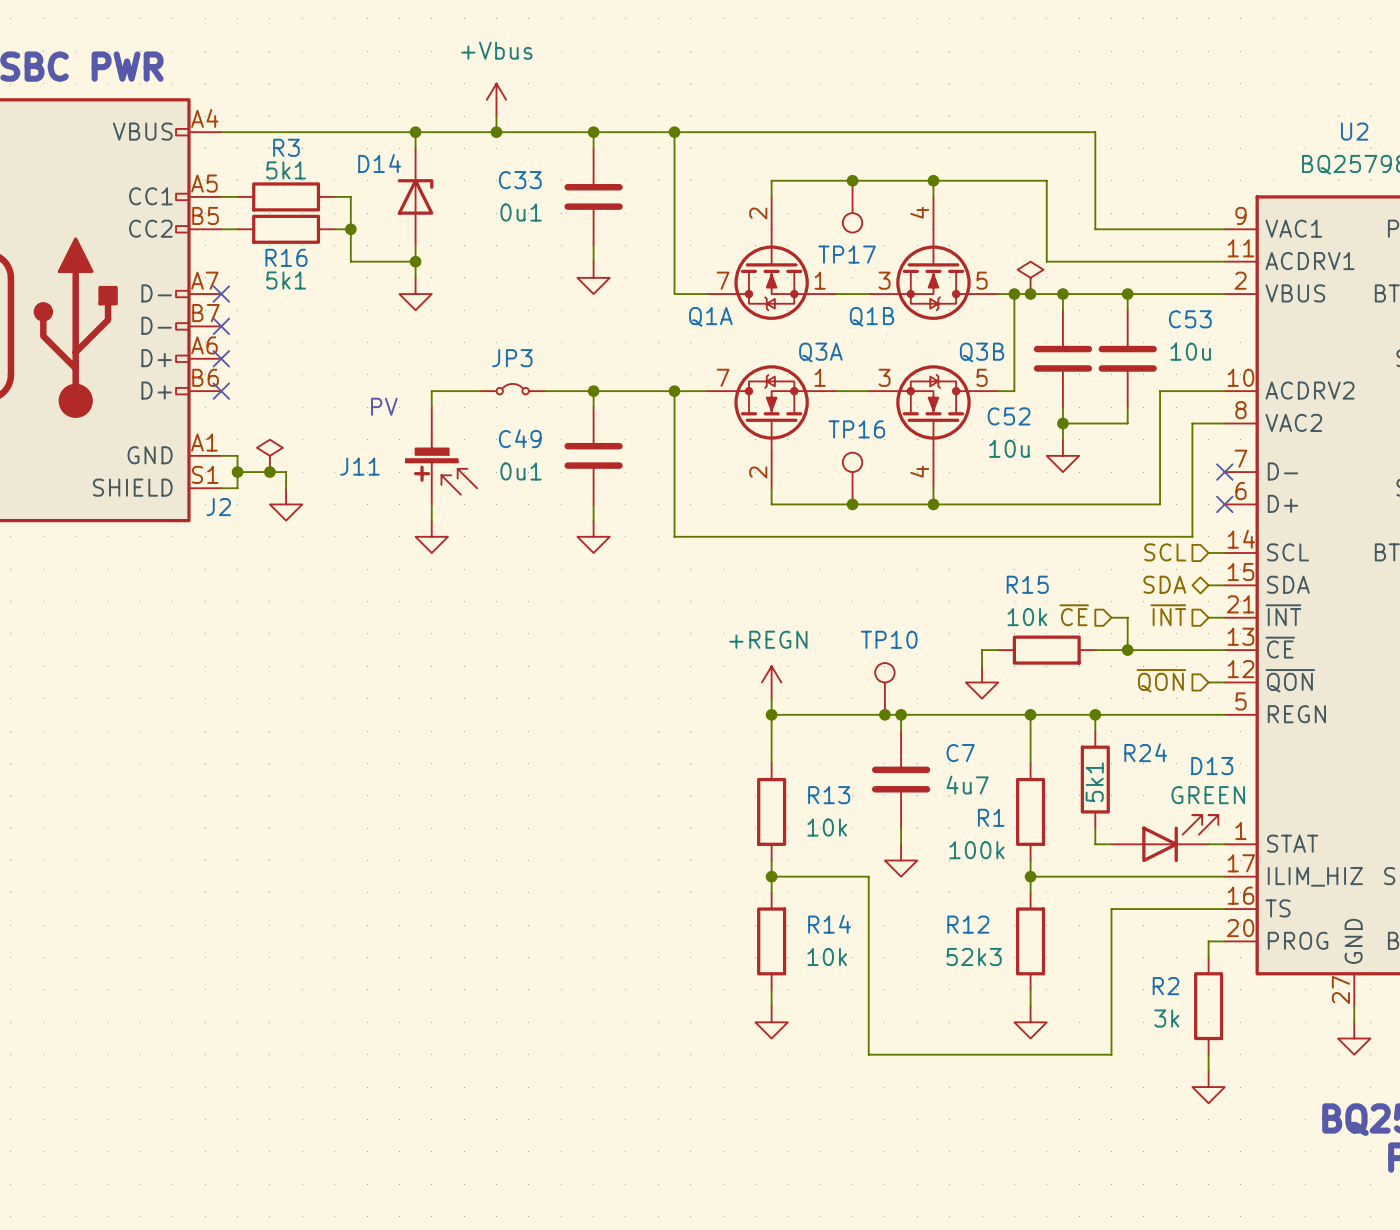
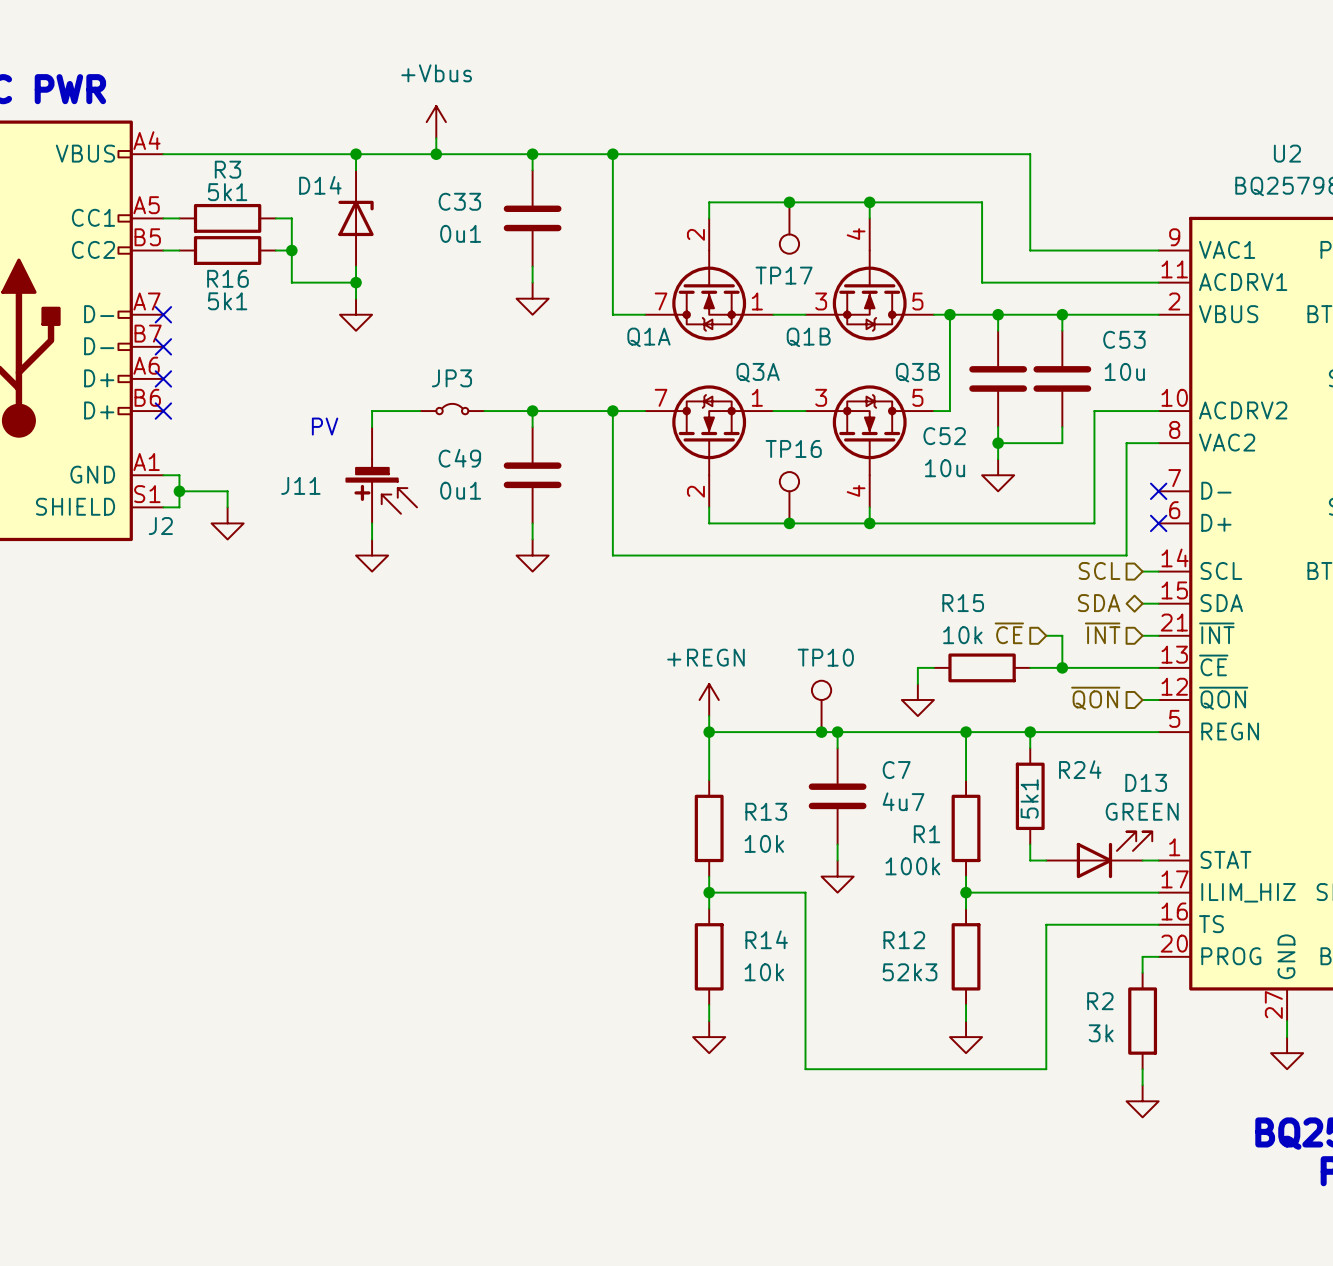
power symbol: (1030, 277) -> none
junction: (1030, 294) -> none
power symbol: (269, 455) -> none
junction: (269, 472) -> none

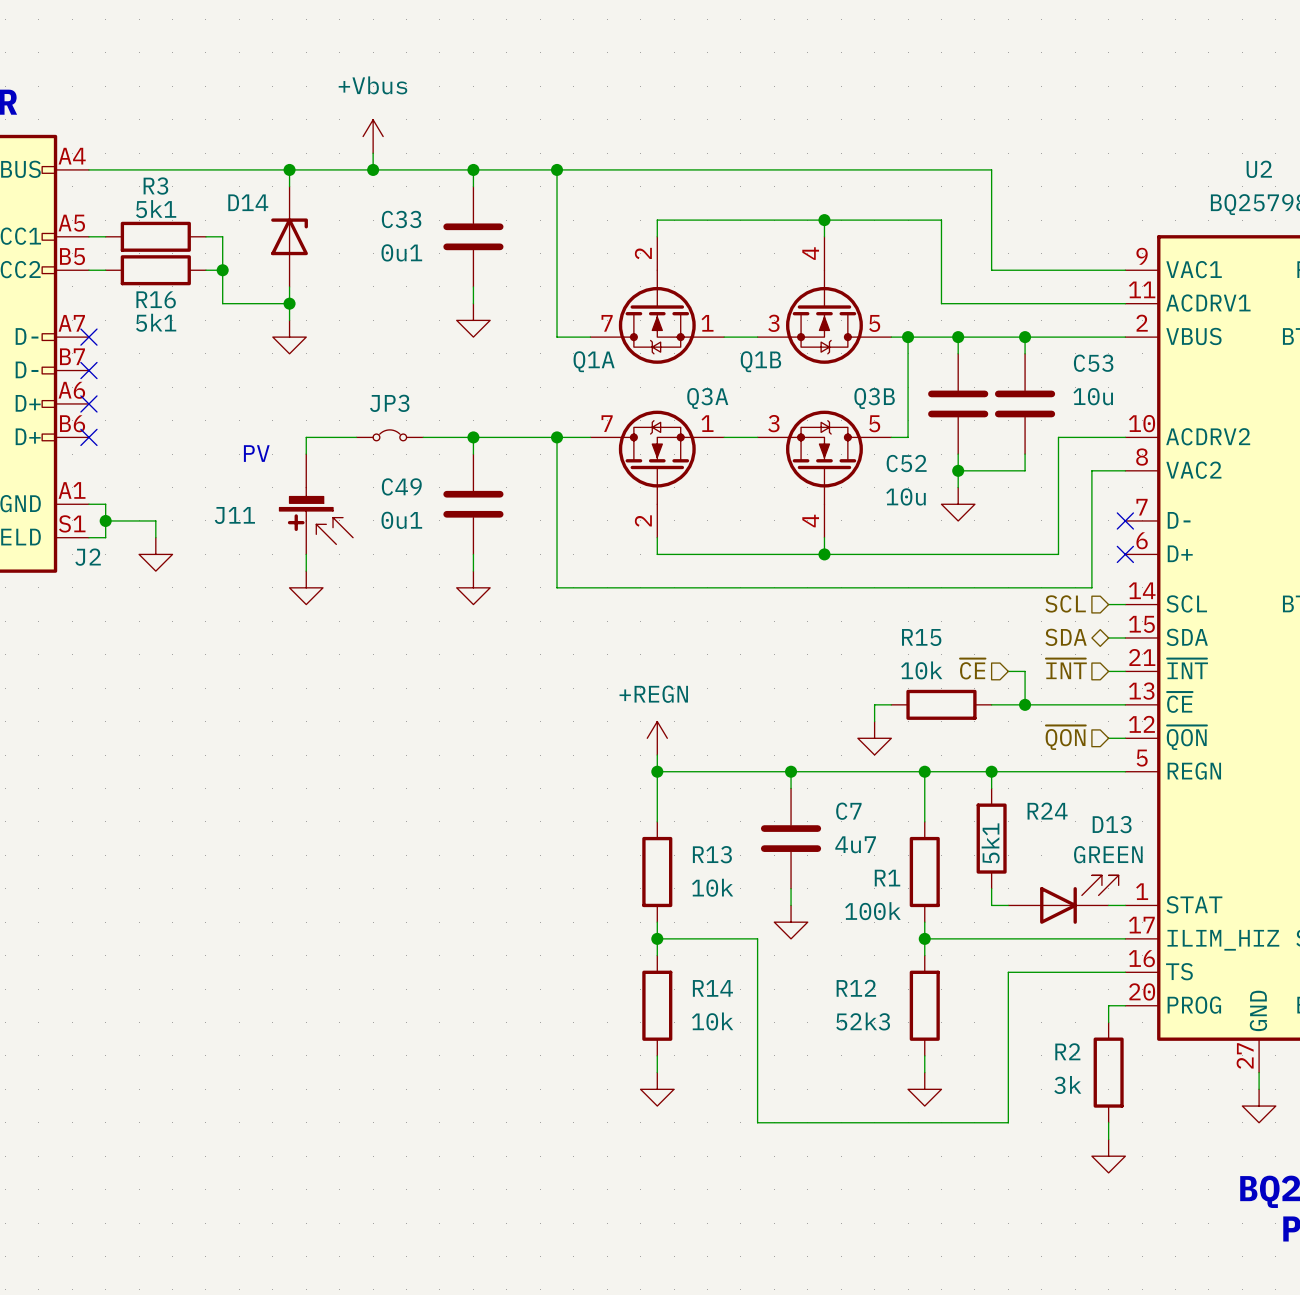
junction: (789, 202) -> none
TP17: (789, 228) -> none
TP16: (789, 497) -> none
junction: (789, 523) -> none
TP10: (821, 706) -> none
junction: (821, 732) -> none

